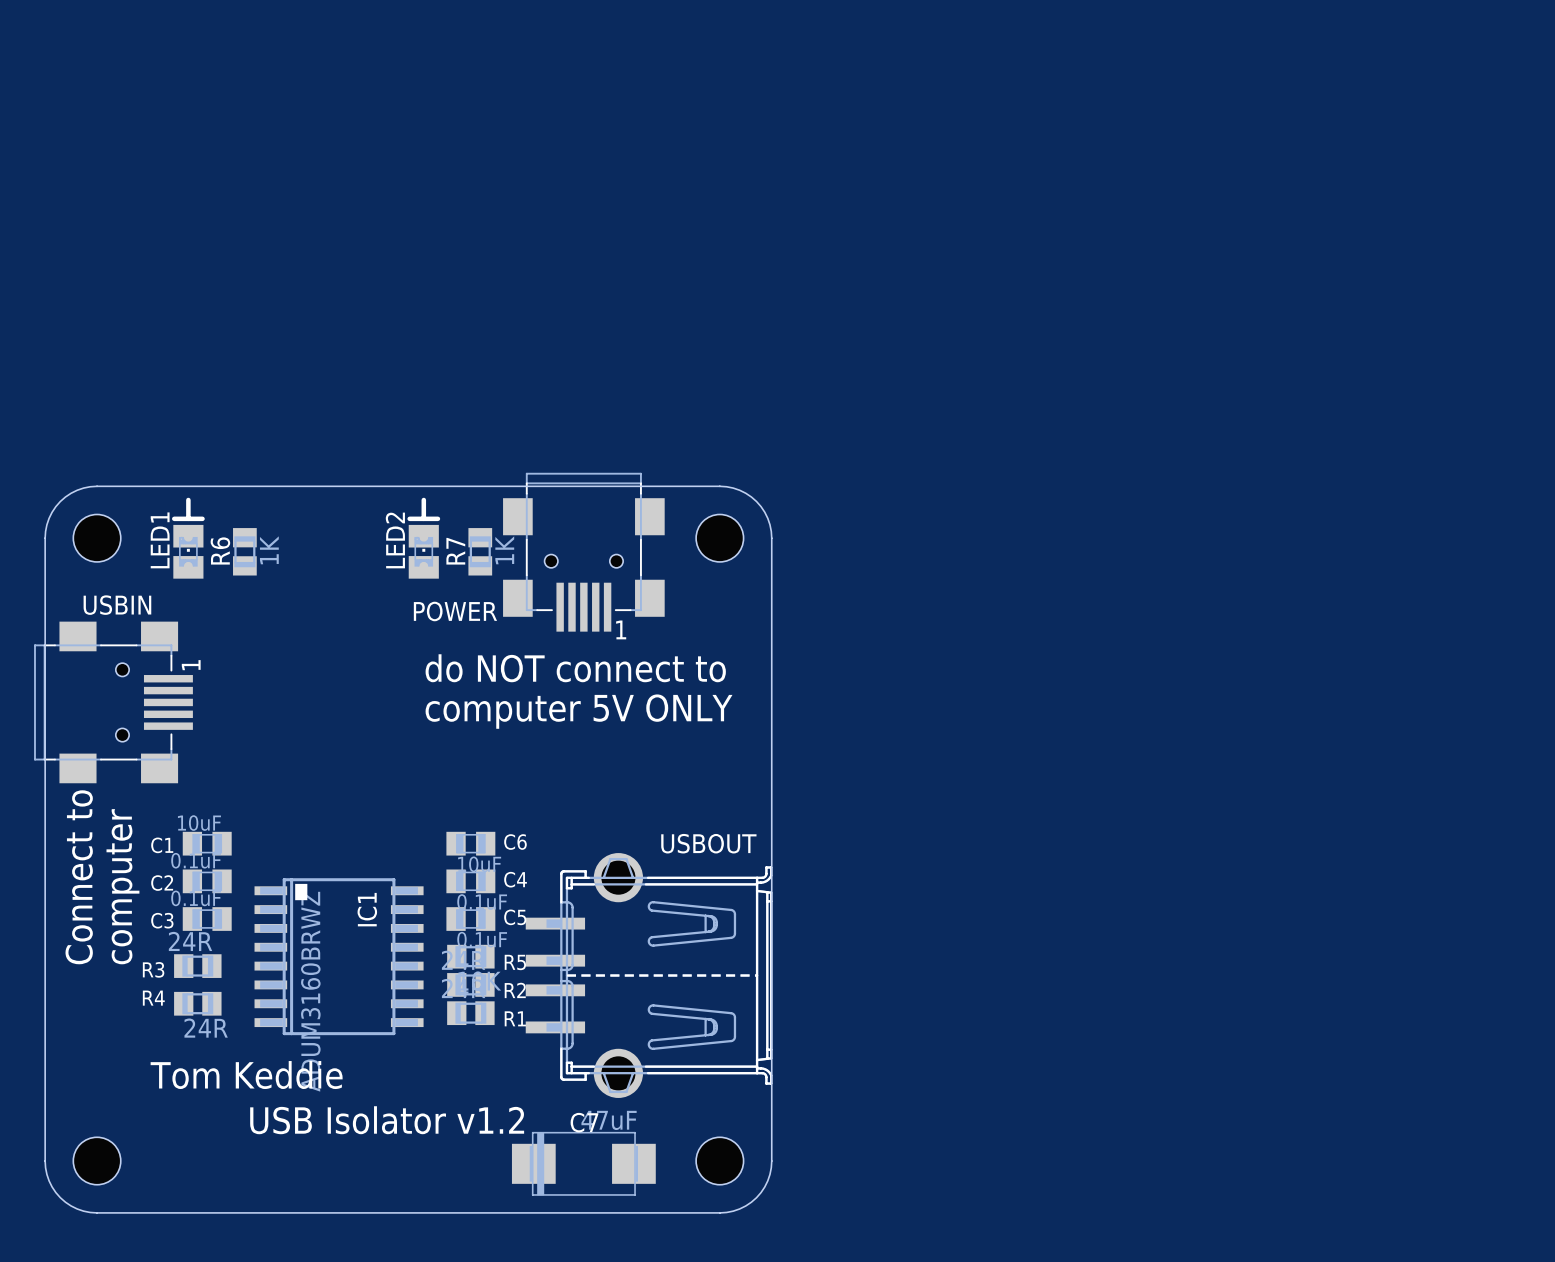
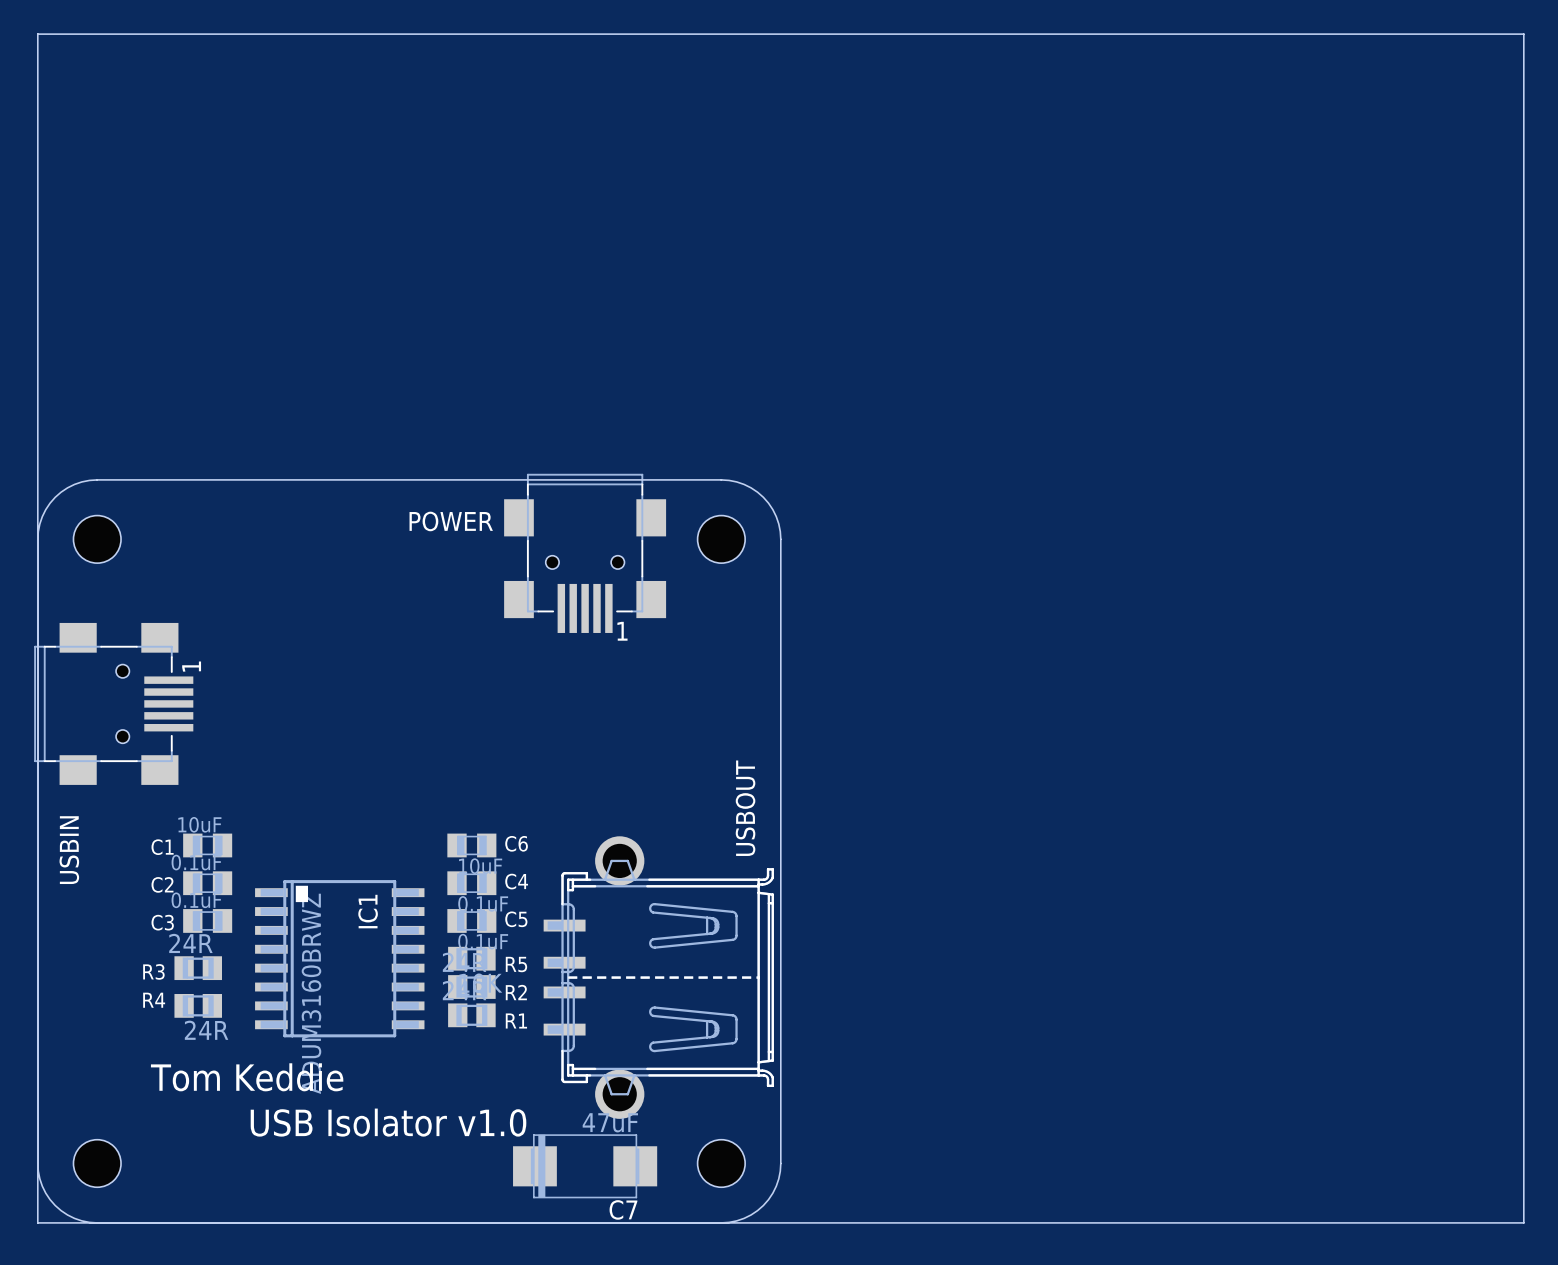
board edge: none -> (37, 34) (1523, 34) (1523, 1222) (37, 1222) (37, 34)
part footprint: [45, 486, 772, 1213] -> [37, 479, 781, 1223]
LED1: (188, 538) -> none
LED2: (423, 538) -> none
R6: 1K (244, 551) -> none
R7: 1K (480, 551) -> none
USBIN name rotation: 0° (117, 605) -> 90° counterclockwise (69, 850)
USBIN name position: USBIN (117, 605) -> USBIN (69, 850)
POWER name position: POWER (455, 611) -> POWER (451, 521)
text: do NOT connect to (575, 668) -> none
text: computer 5V ONLY (579, 711) -> none
USBOUT name position: USBOUT (708, 843) -> USBOUT (745, 808)
USBOUT footprint: [525, 853, 773, 1098] -> [543, 836, 774, 1119]
text: Connect to (79, 877) -> none
text: computer (122, 886) -> none
text: USB Isolator v1.2 (387, 1120) -> USB Isolator v1.0 (388, 1122)
C7 name position: C7 (584, 1122) -> C7 (623, 1209)

